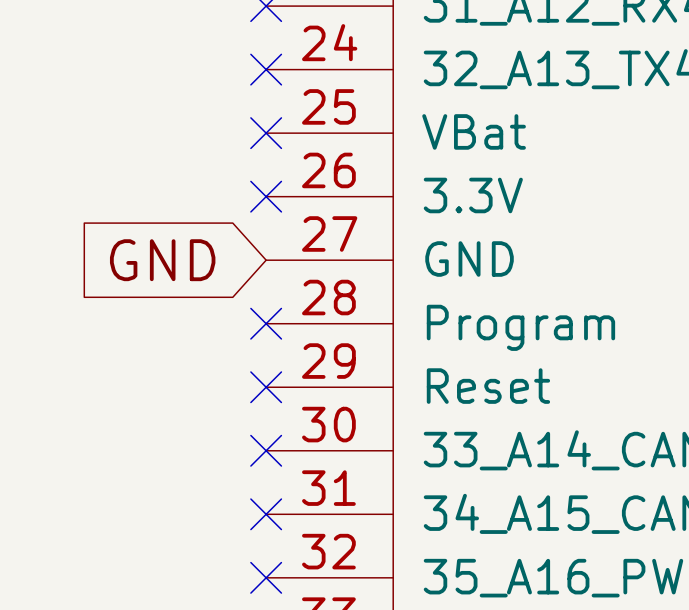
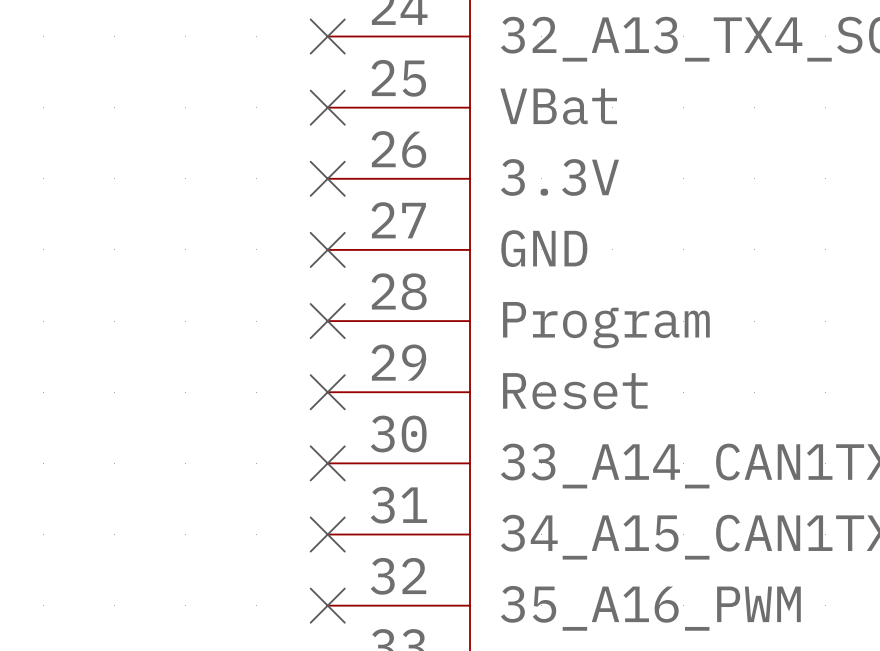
global label: GND (162, 260) -> none
no-connect mark: none -> (327, 249)

